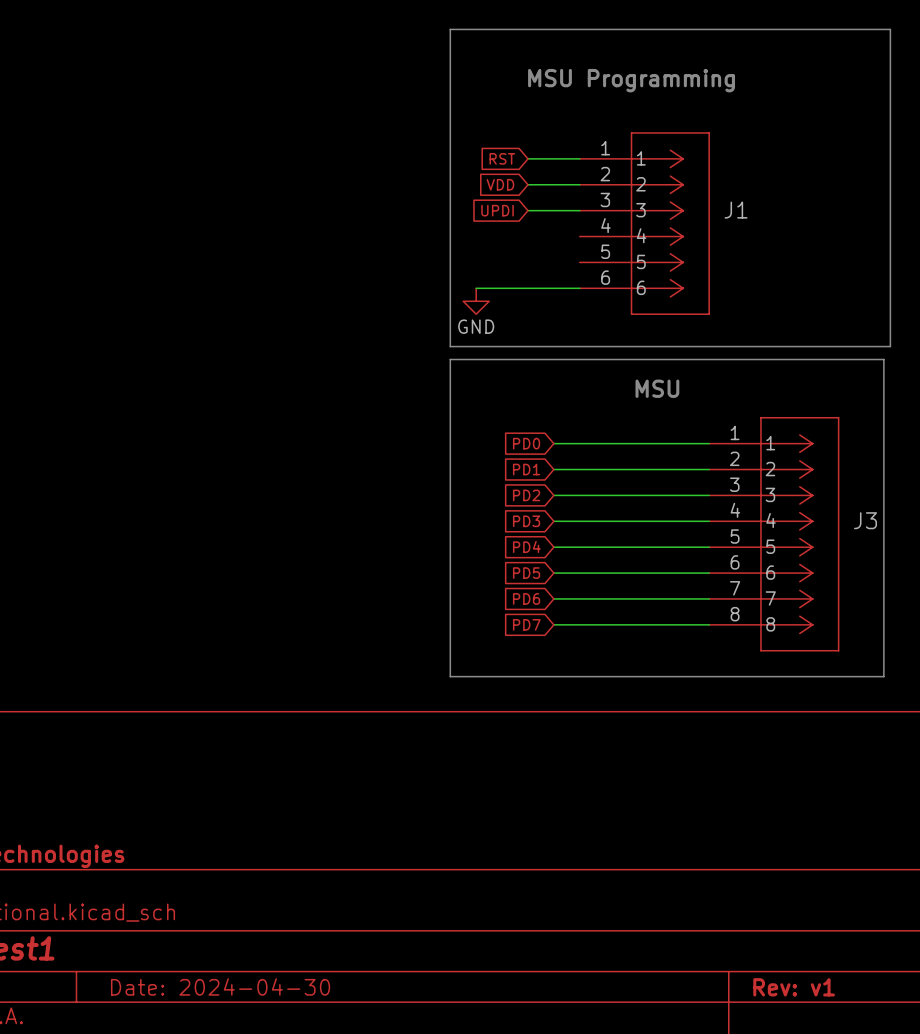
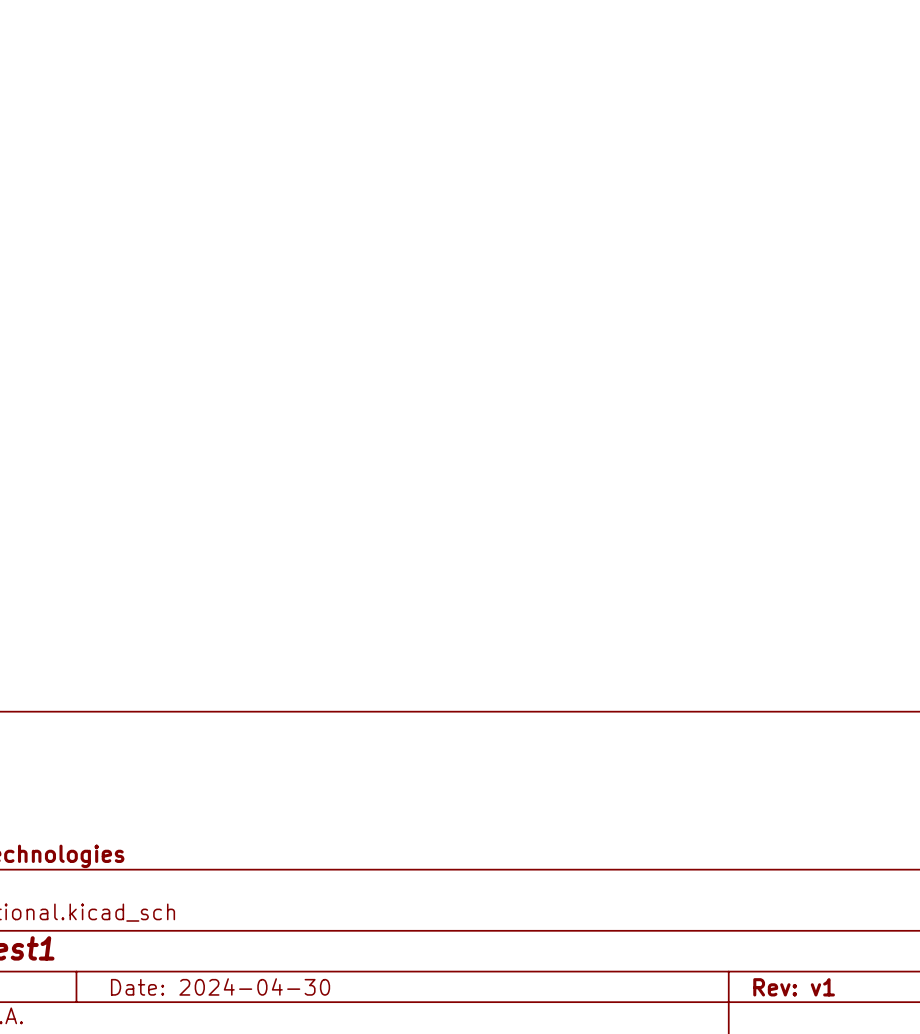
line: (450, 29) (890, 29) (890, 346) (450, 346) (450, 29) -> none
text: MSU Programming (631, 80) -> none
global label: RST (502, 158) -> none
wire: (527, 158) (579, 158) -> none
global label: VDD (500, 184) -> none
wire: (527, 184) (579, 184) -> none
global label: UPDI (497, 210) -> none
wire: (527, 210) (579, 210) -> none
J1: (644, 223) -> none
wire: (476, 288) (579, 288) -> none
power symbol: GND (476, 301) -> none
line: (450, 359) (450, 676) (883, 676) (883, 359) (450, 359) -> none
text: MSU (657, 388) -> none
global label: PD0 (526, 443) -> none
wire: (553, 443) (709, 443) -> none
global label: PD1 (526, 469) -> none
wire: (553, 469) (709, 469) -> none
global label: PD2 (526, 495) -> none
wire: (553, 495) (709, 495) -> none
global label: PD3 (526, 521) -> none
wire: (553, 521) (709, 521) -> none
J3: (774, 534) -> none
global label: PD4 (526, 546) -> none
wire: (553, 547) (709, 547) -> none
global label: PD5 (526, 573) -> none
wire: (553, 573) (709, 573) -> none
global label: PD6 (526, 598) -> none
wire: (553, 598) (709, 598) -> none
global label: PD7 (526, 624) -> none
wire: (553, 624) (709, 624) -> none

